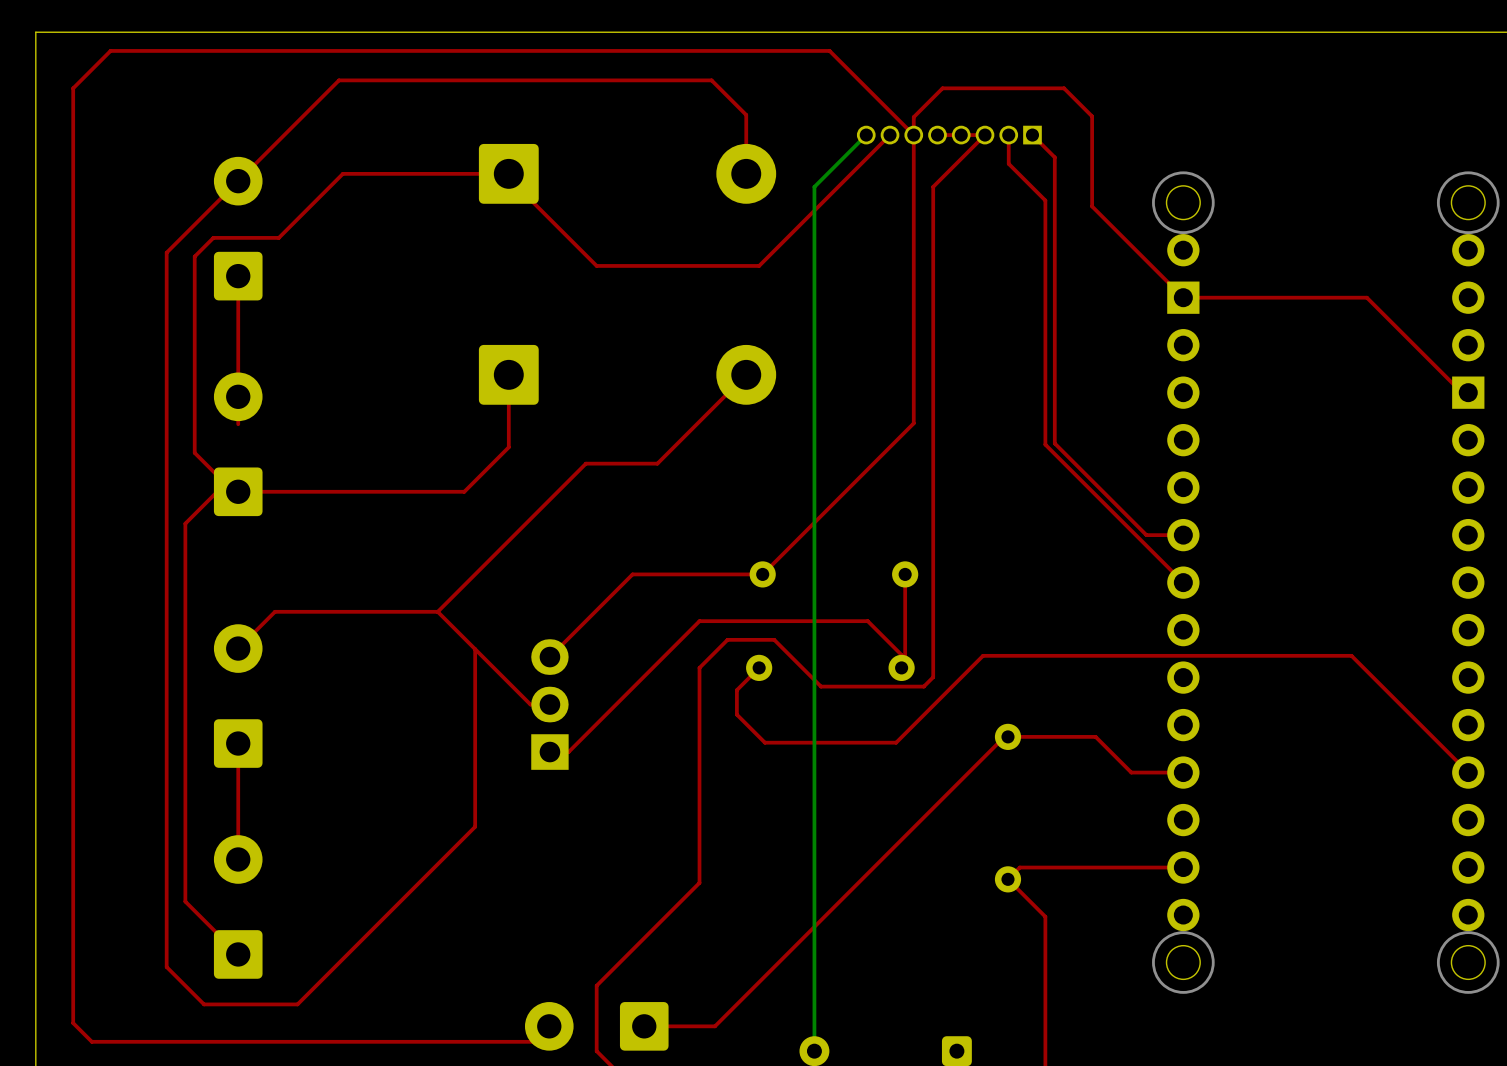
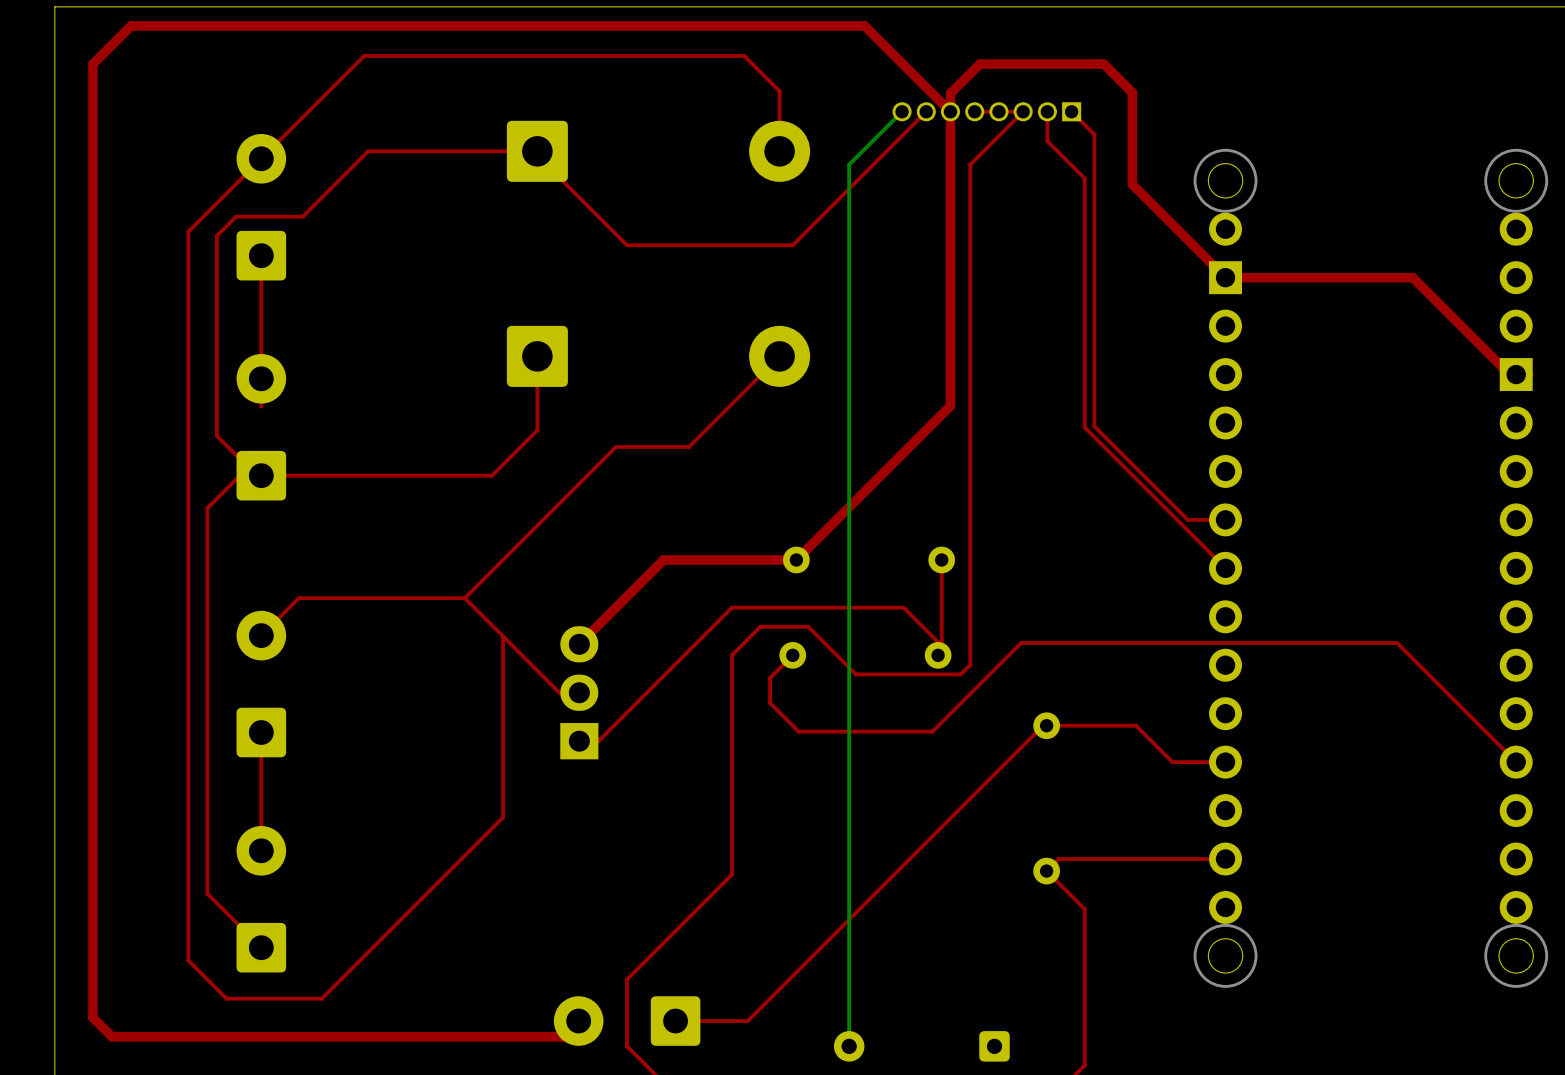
top track width: thin (913, 135) (829, 50) (110, 50) (73, 88) (73, 1023) (91, 1041) (533, 1041) (549, 1026) -> thick (950, 111) (864, 25) (131, 25) (92, 64) (92, 1017) (112, 1036) (562, 1036) (578, 1021)
top track width: thin (1480, 392) (1461, 392) (1366, 297) (1183, 297) (1092, 206) (1092, 116) (1064, 88) (942, 88) (913, 117) (913, 423) (762, 574) (632, 574) (549, 657) (560, 667) -> thick (1528, 374) (1509, 374) (1412, 277) (1225, 277) (1132, 184) (1132, 92) (1103, 64) (979, 64) (950, 93) (950, 405) (796, 559) (663, 559) (579, 644) (589, 654)

